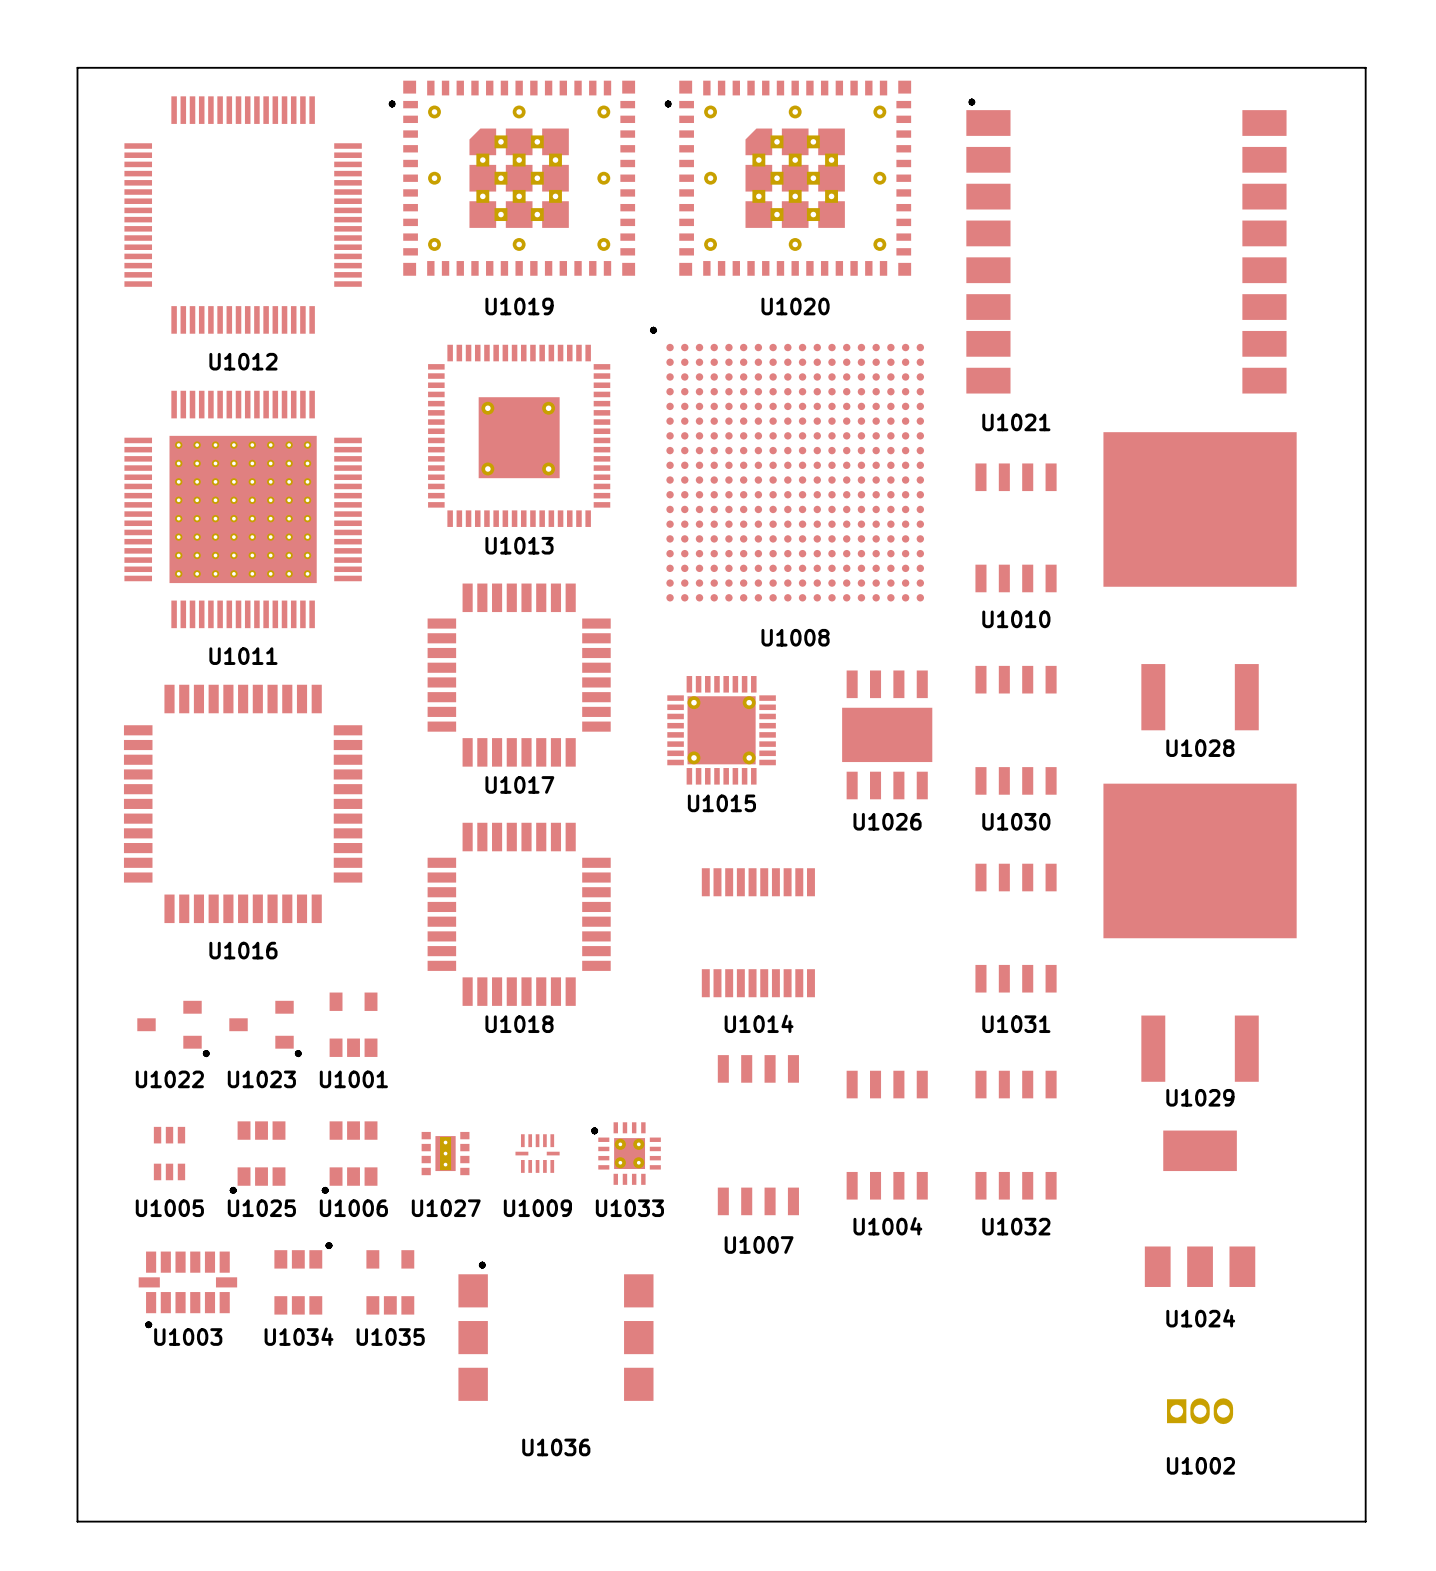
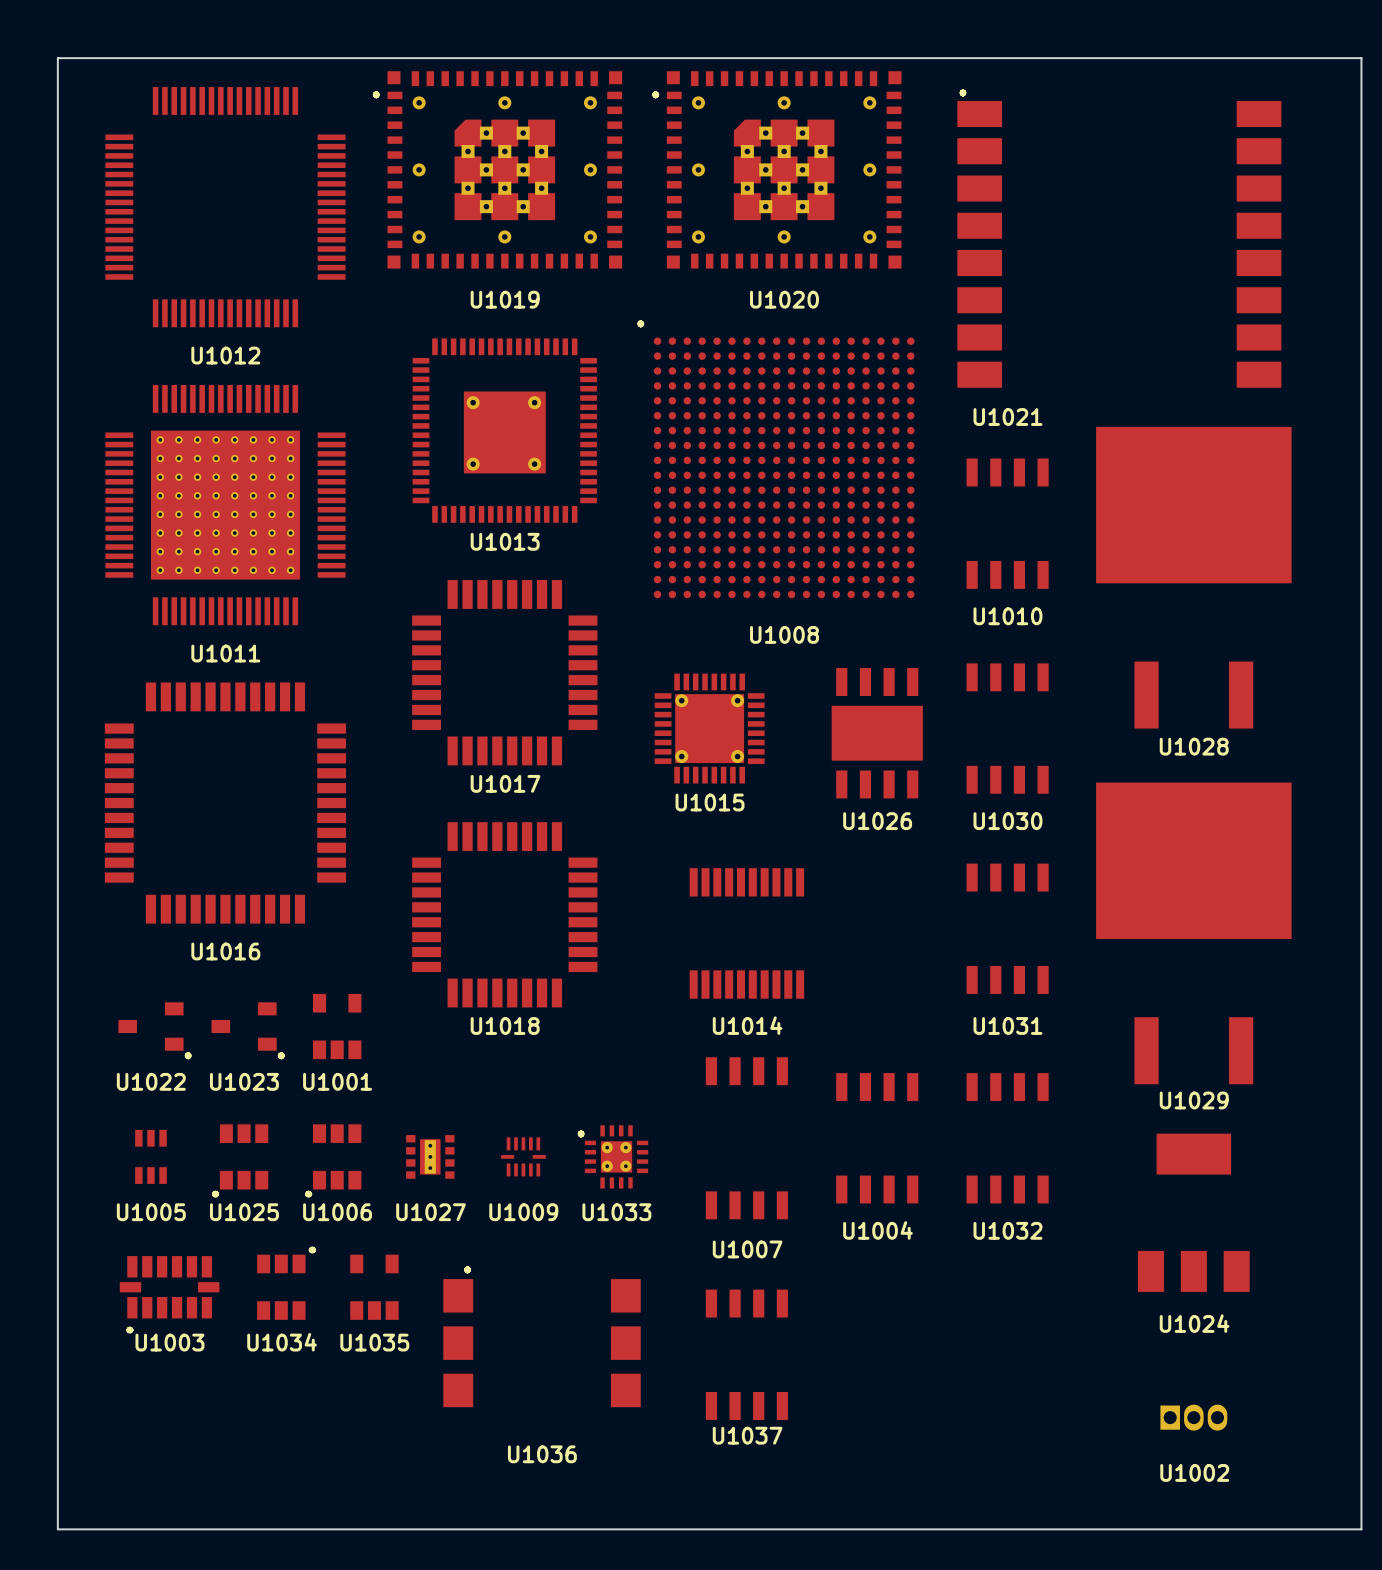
U1037: none -> (746, 1354)

